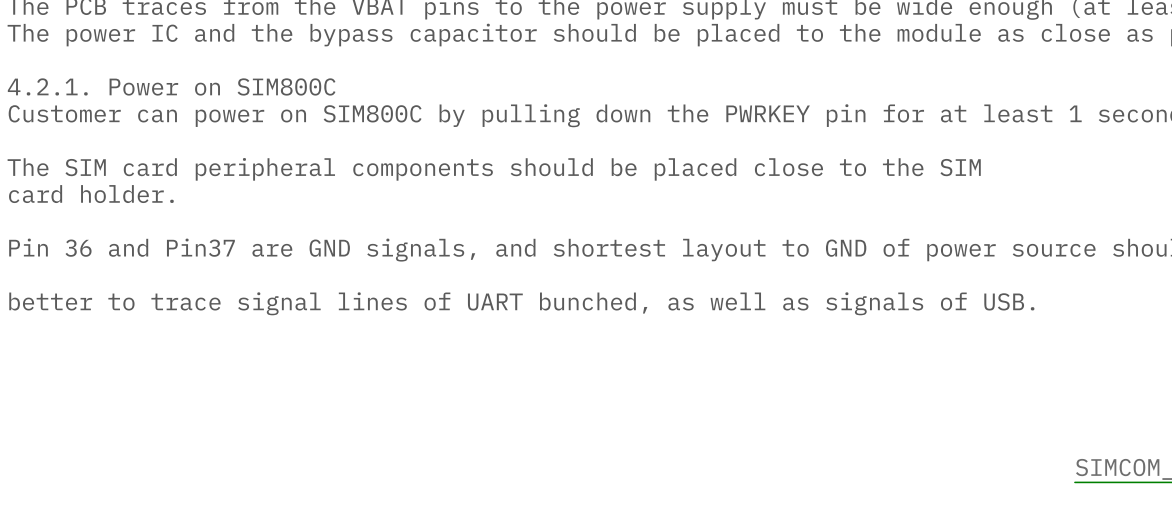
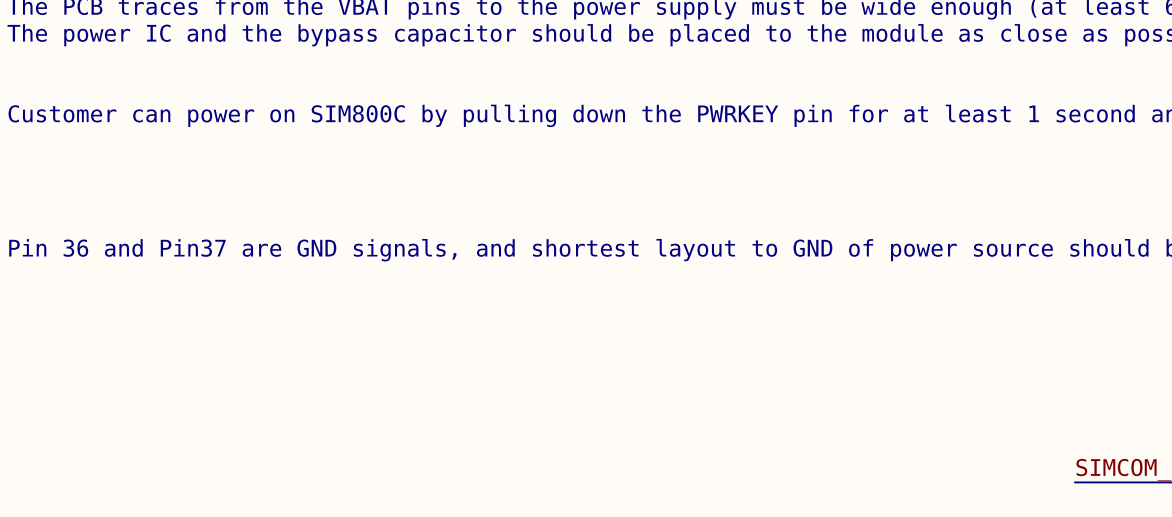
text: 4.2.1. Power on SIM800C (171, 86) -> none
text: The SIM card peripheral components should be placed close to the SIM (494, 169) -> none
text: card holder. (91, 194) -> none
text: better to trace signal lines of UART bunched, as well as signals of USB. (521, 303) -> none

